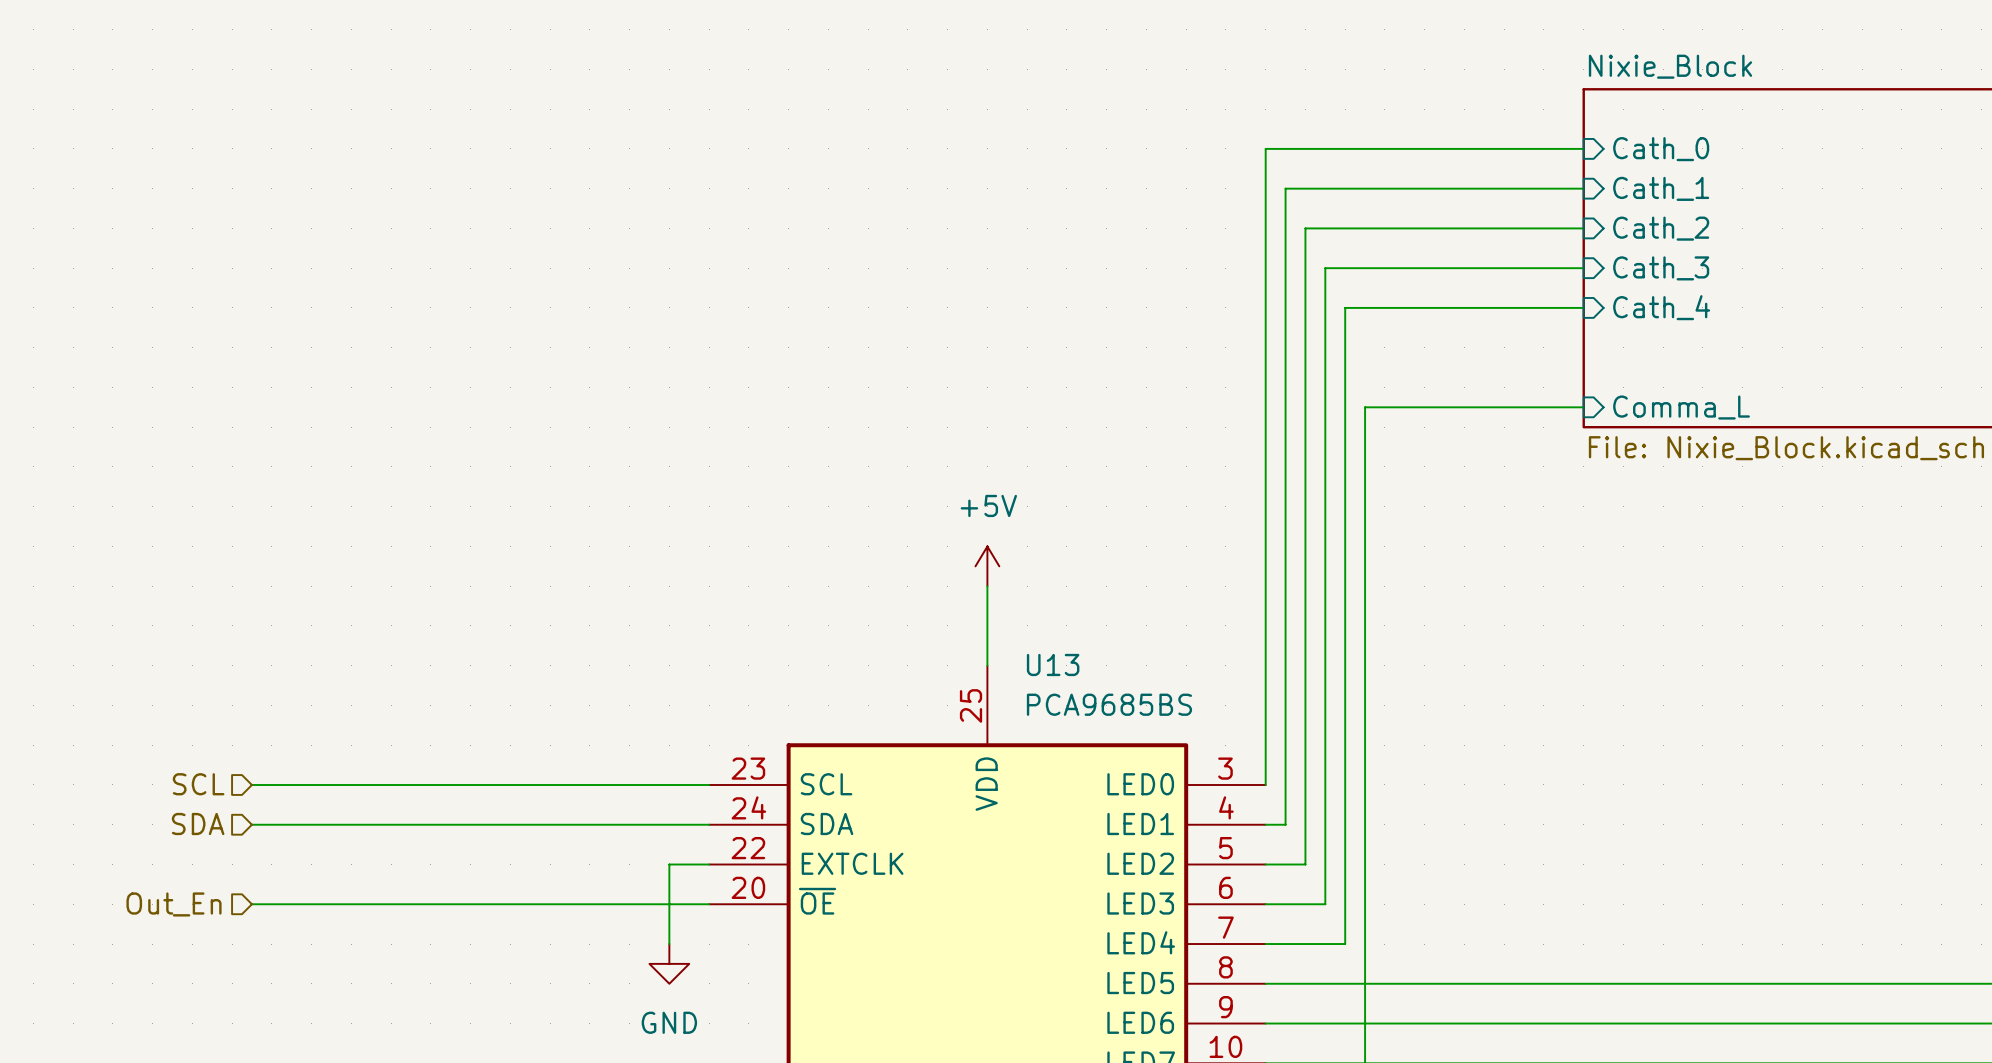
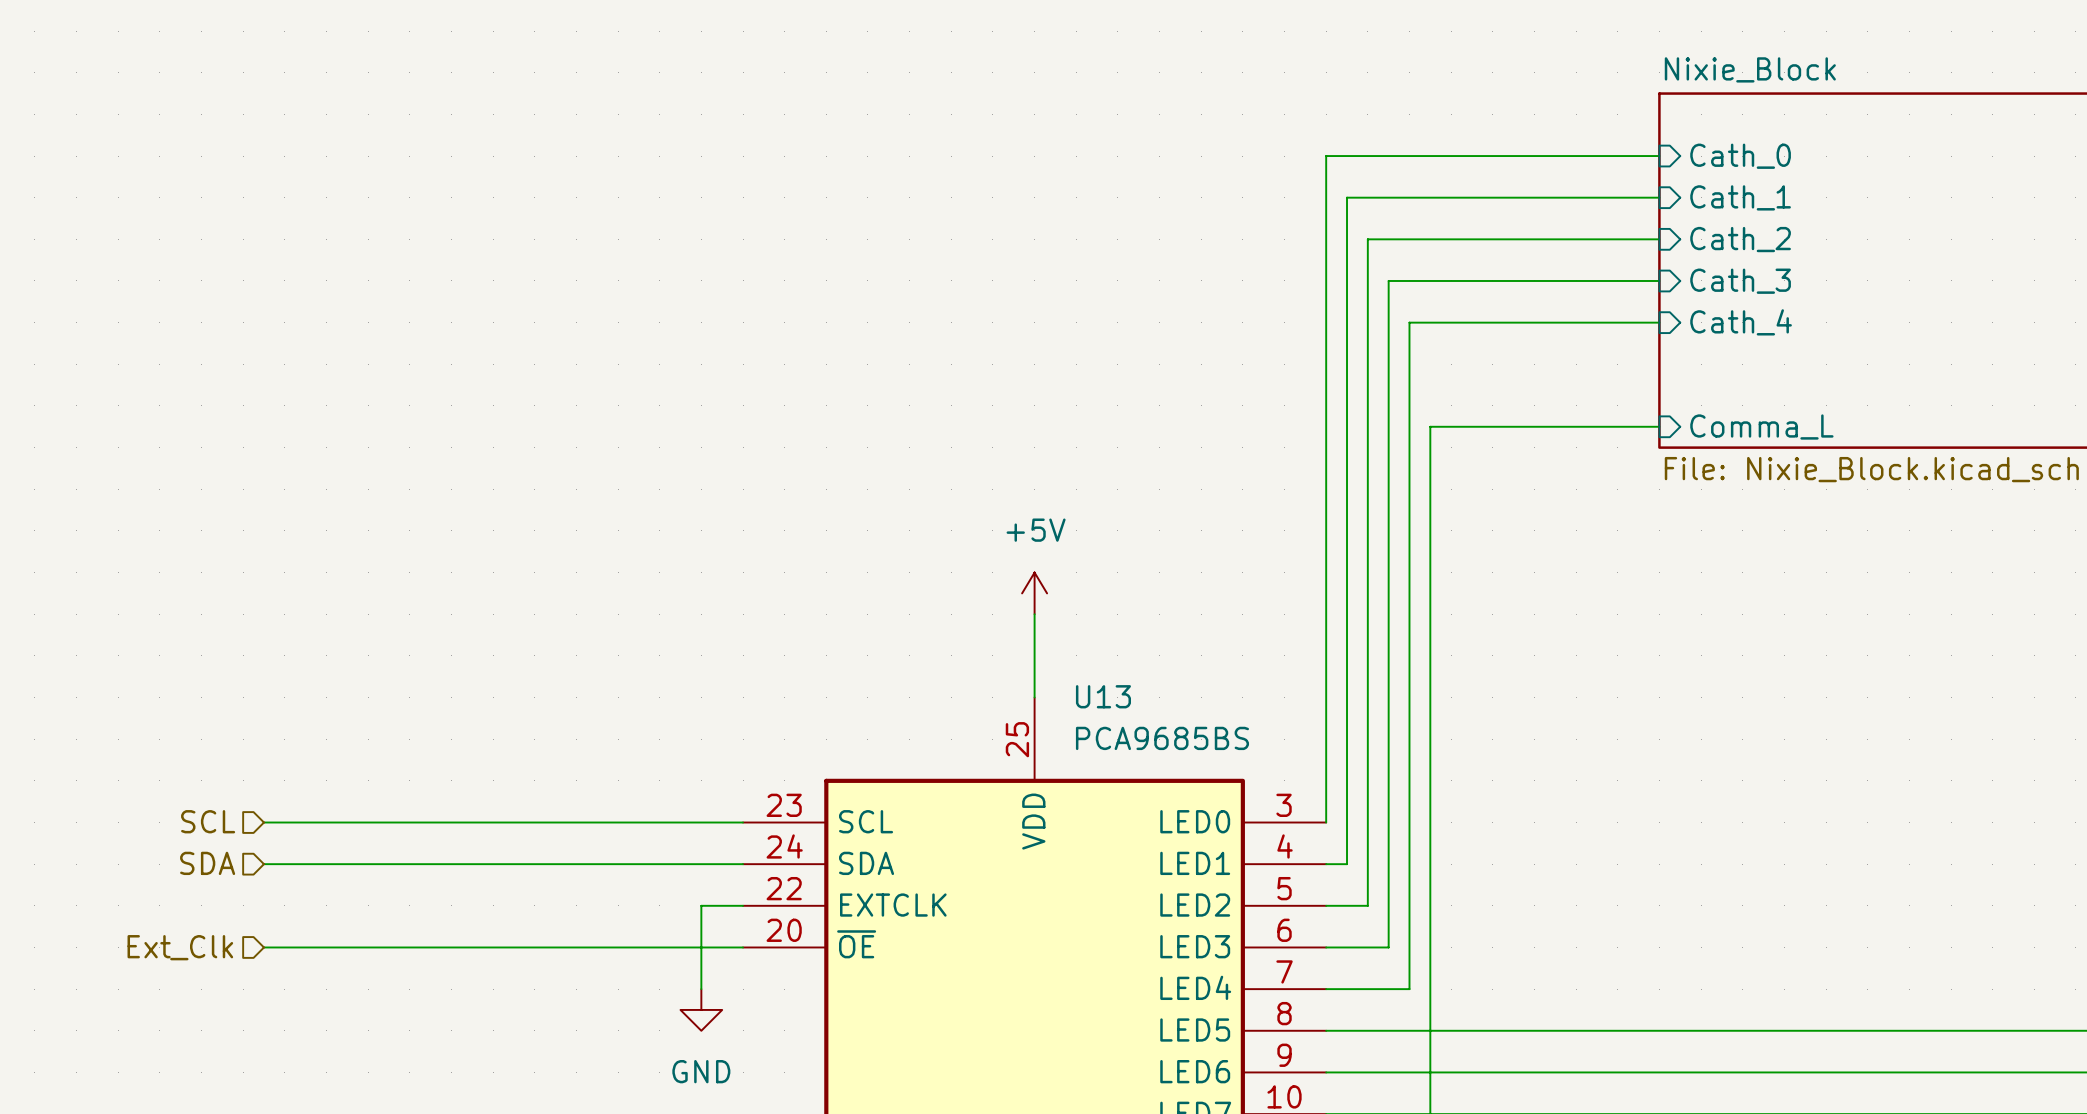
hierarchical label: Out_En (174, 904) -> Ext_Clk (180, 947)

